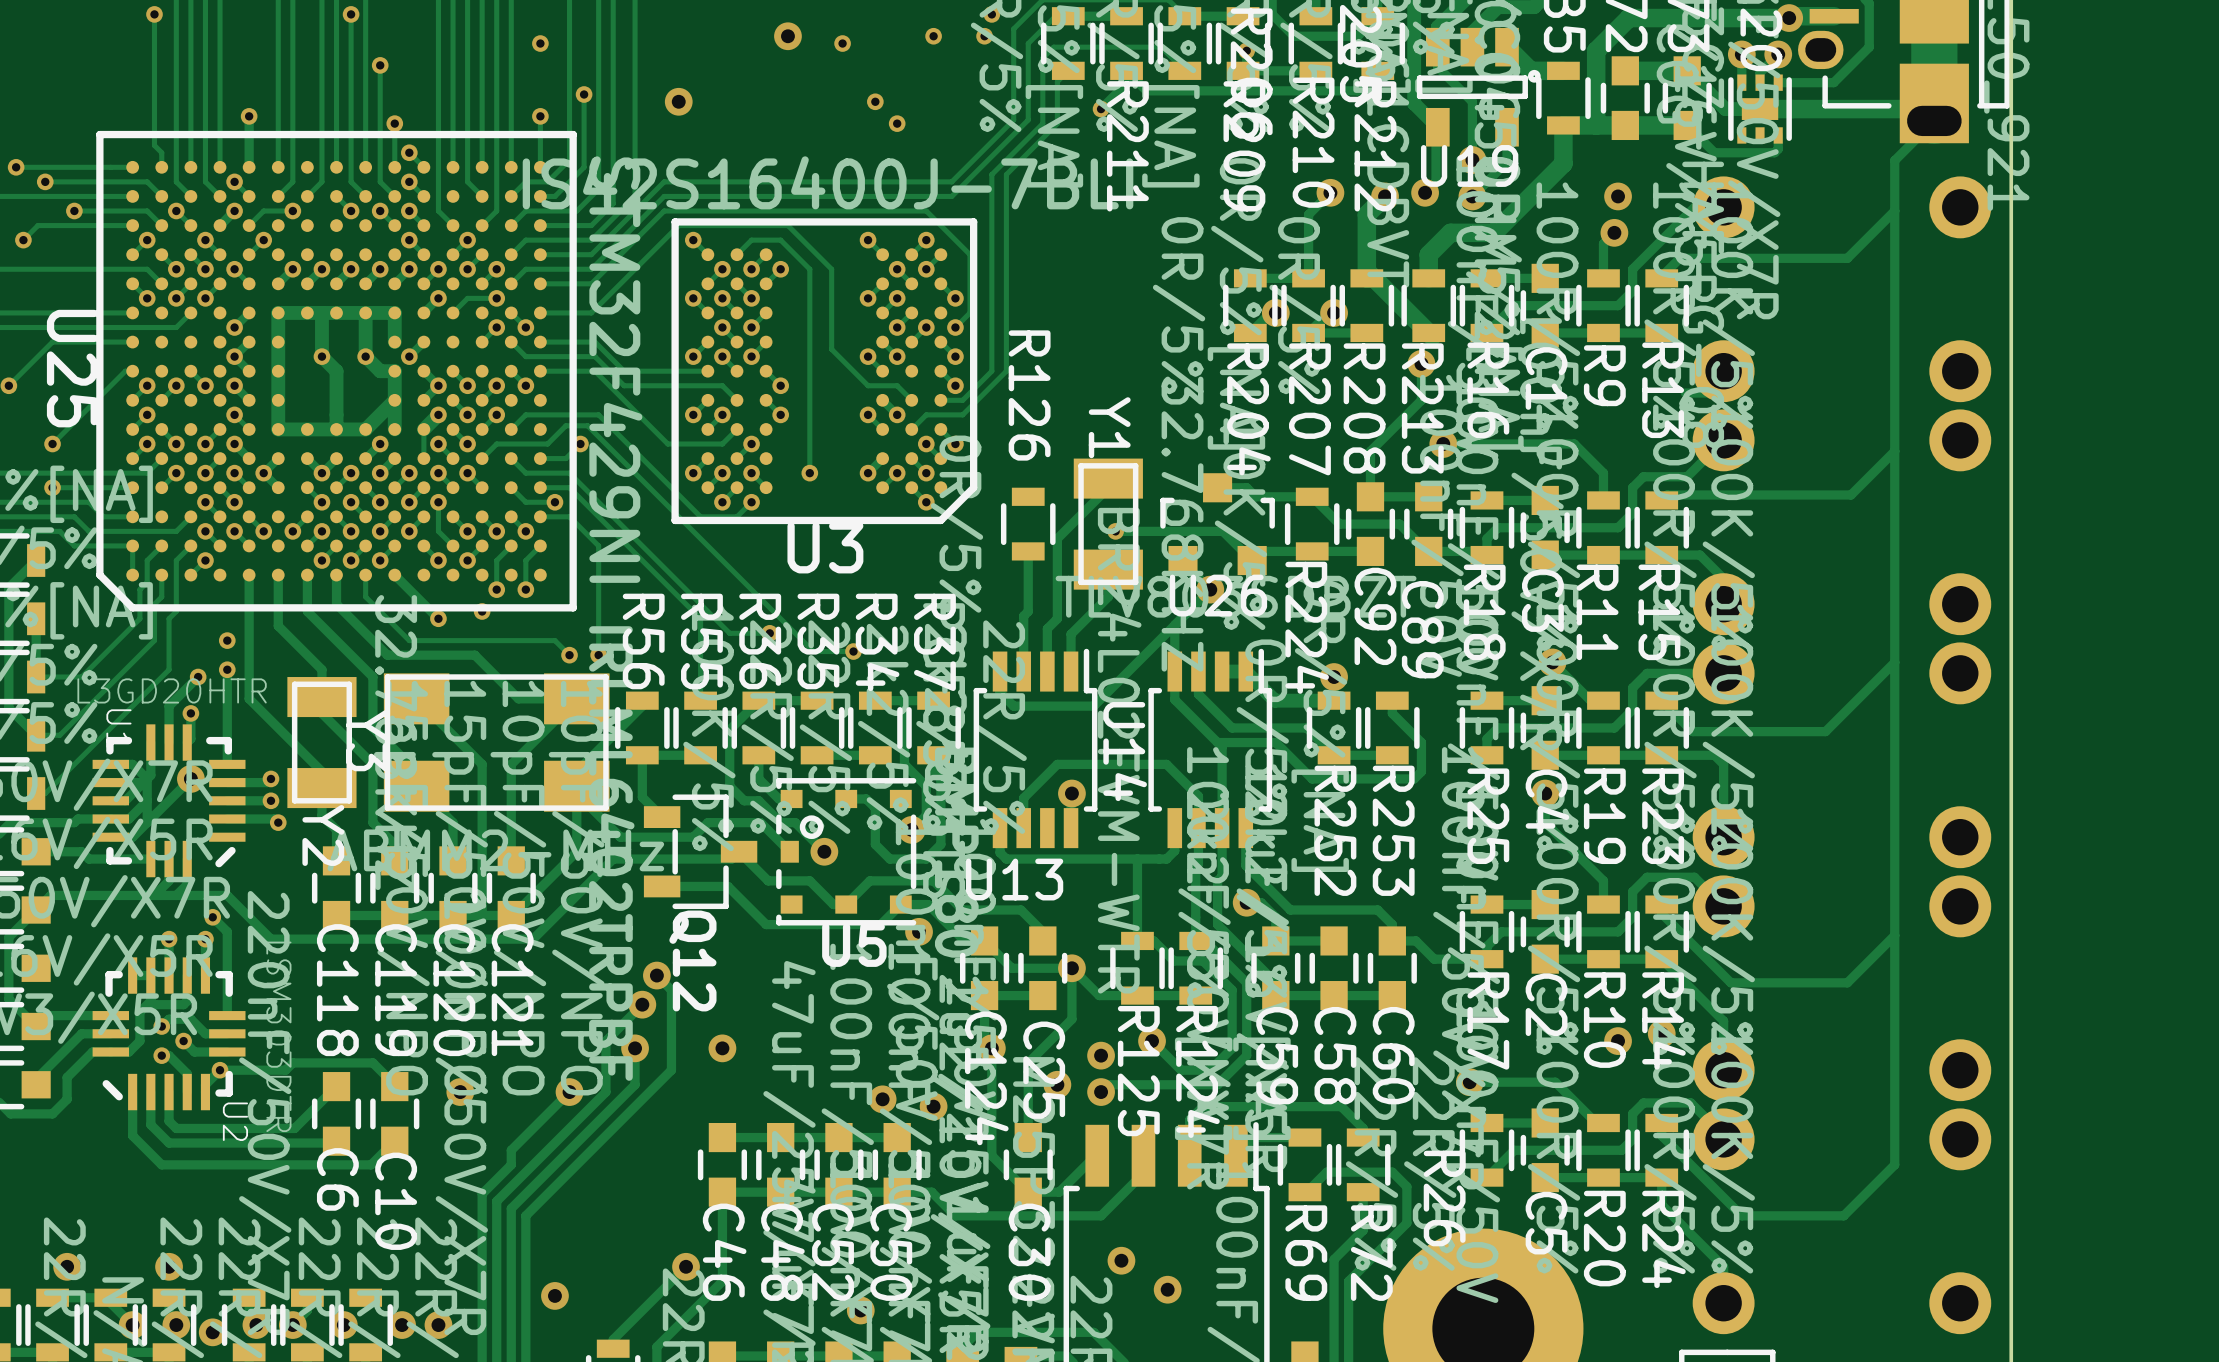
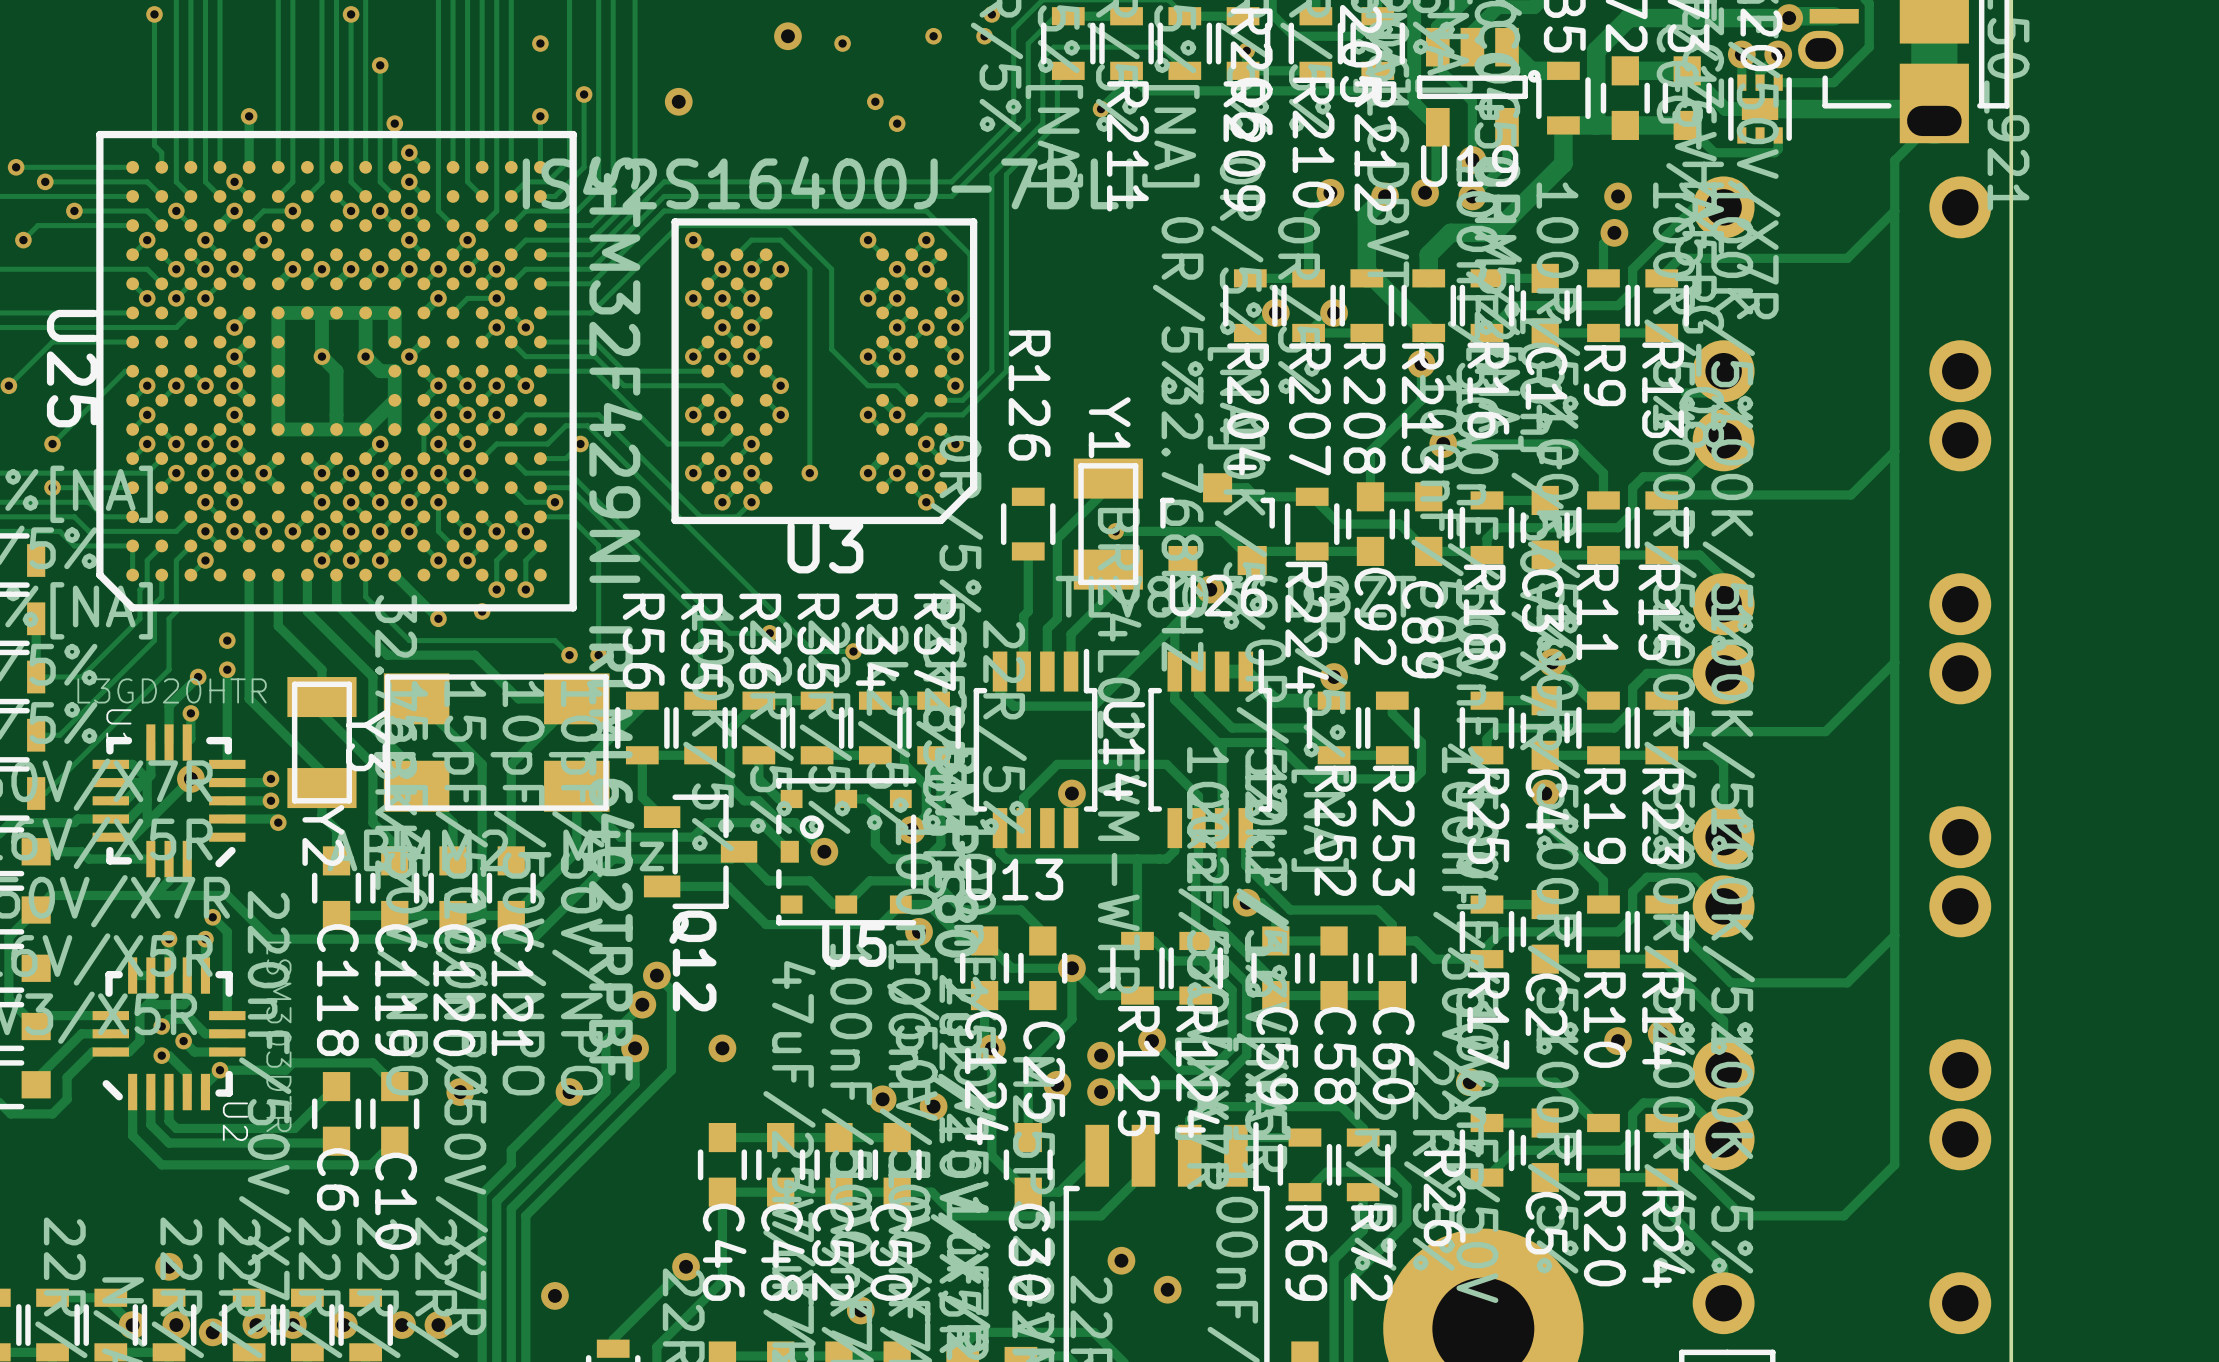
track: (36, 560) (8, 587) (8, 707) (36, 735) -> none
via: (67, 1266) -> none

